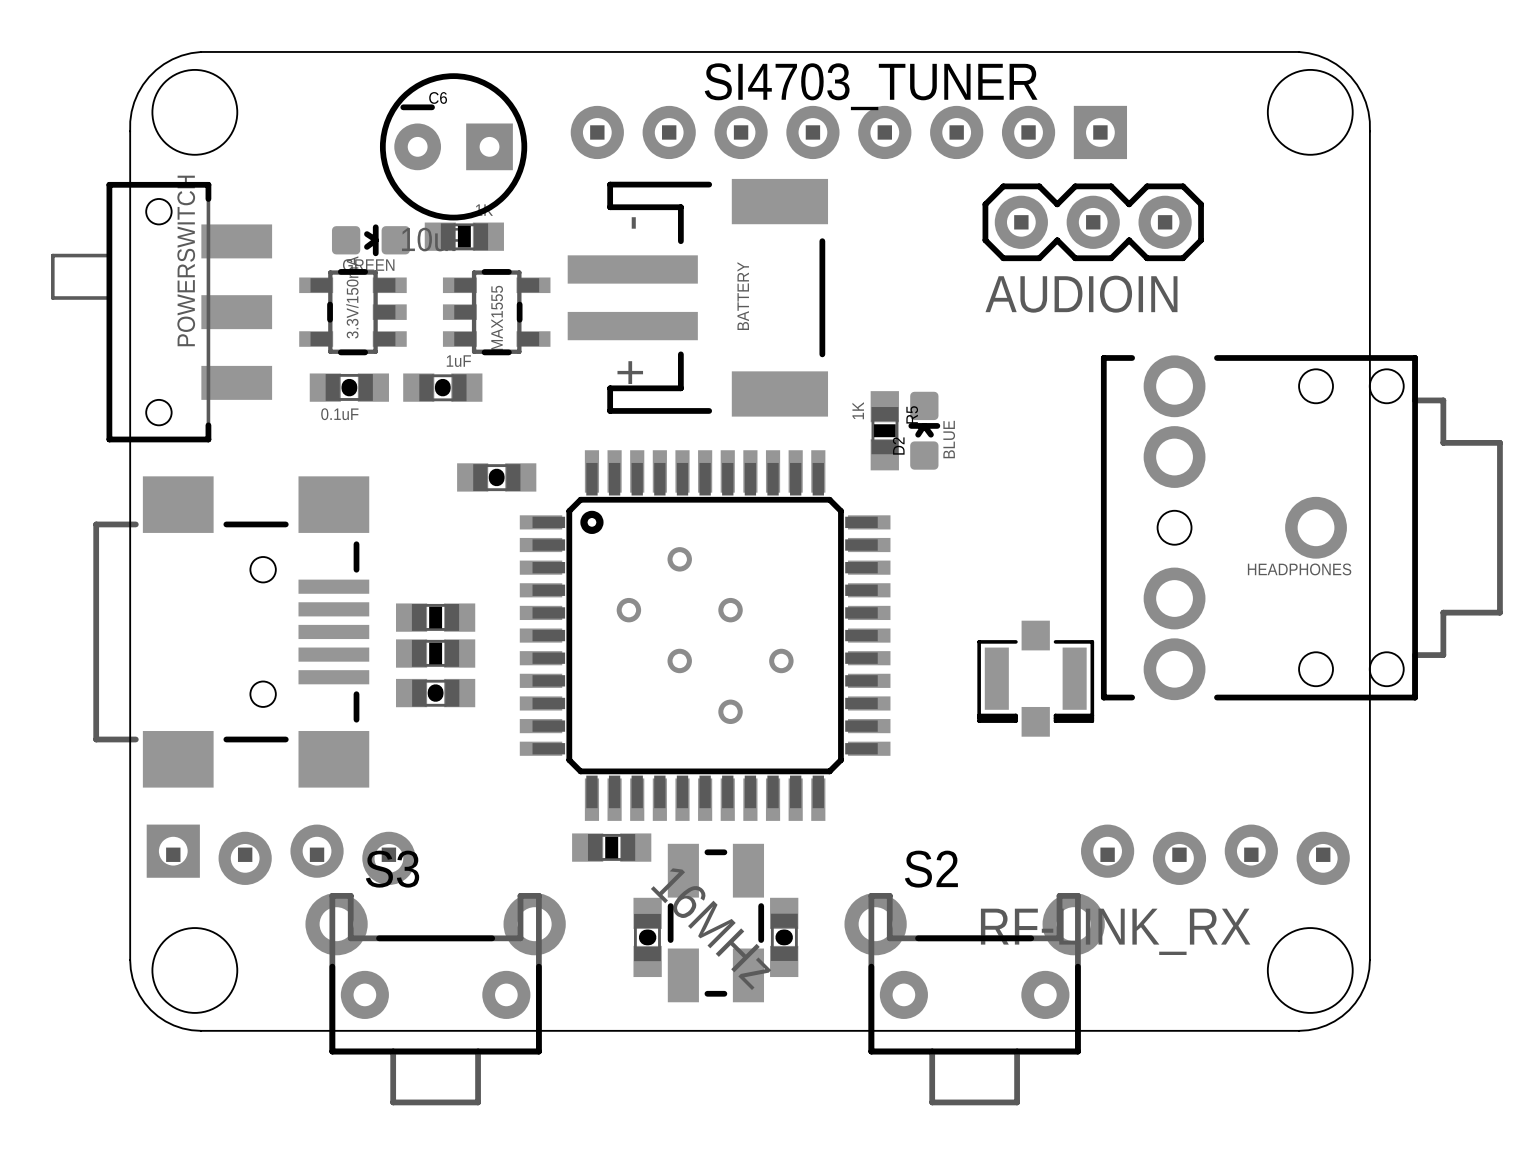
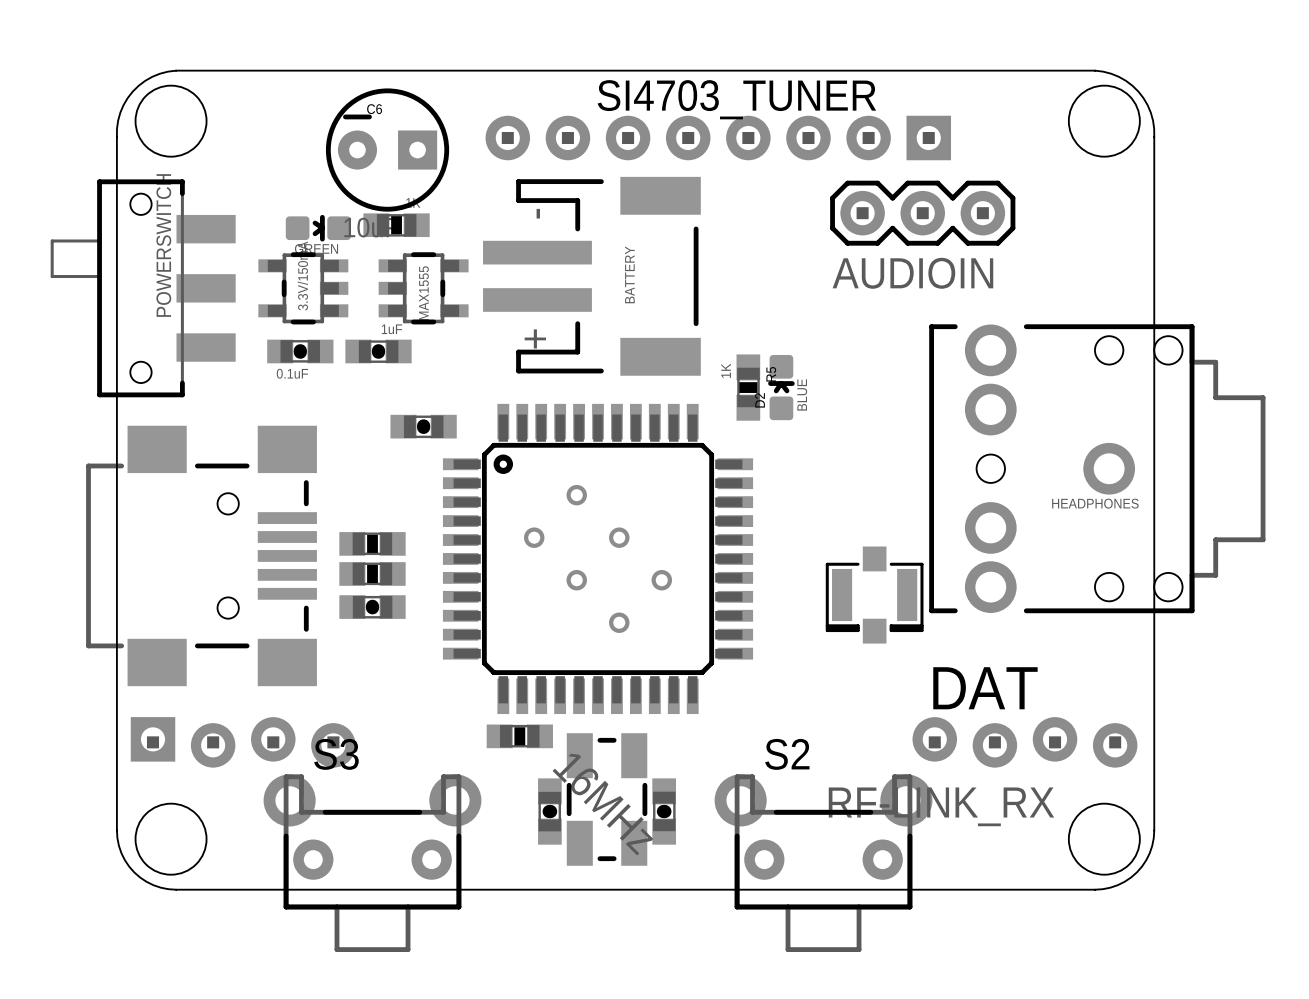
text: none -> DAT (985, 688)

